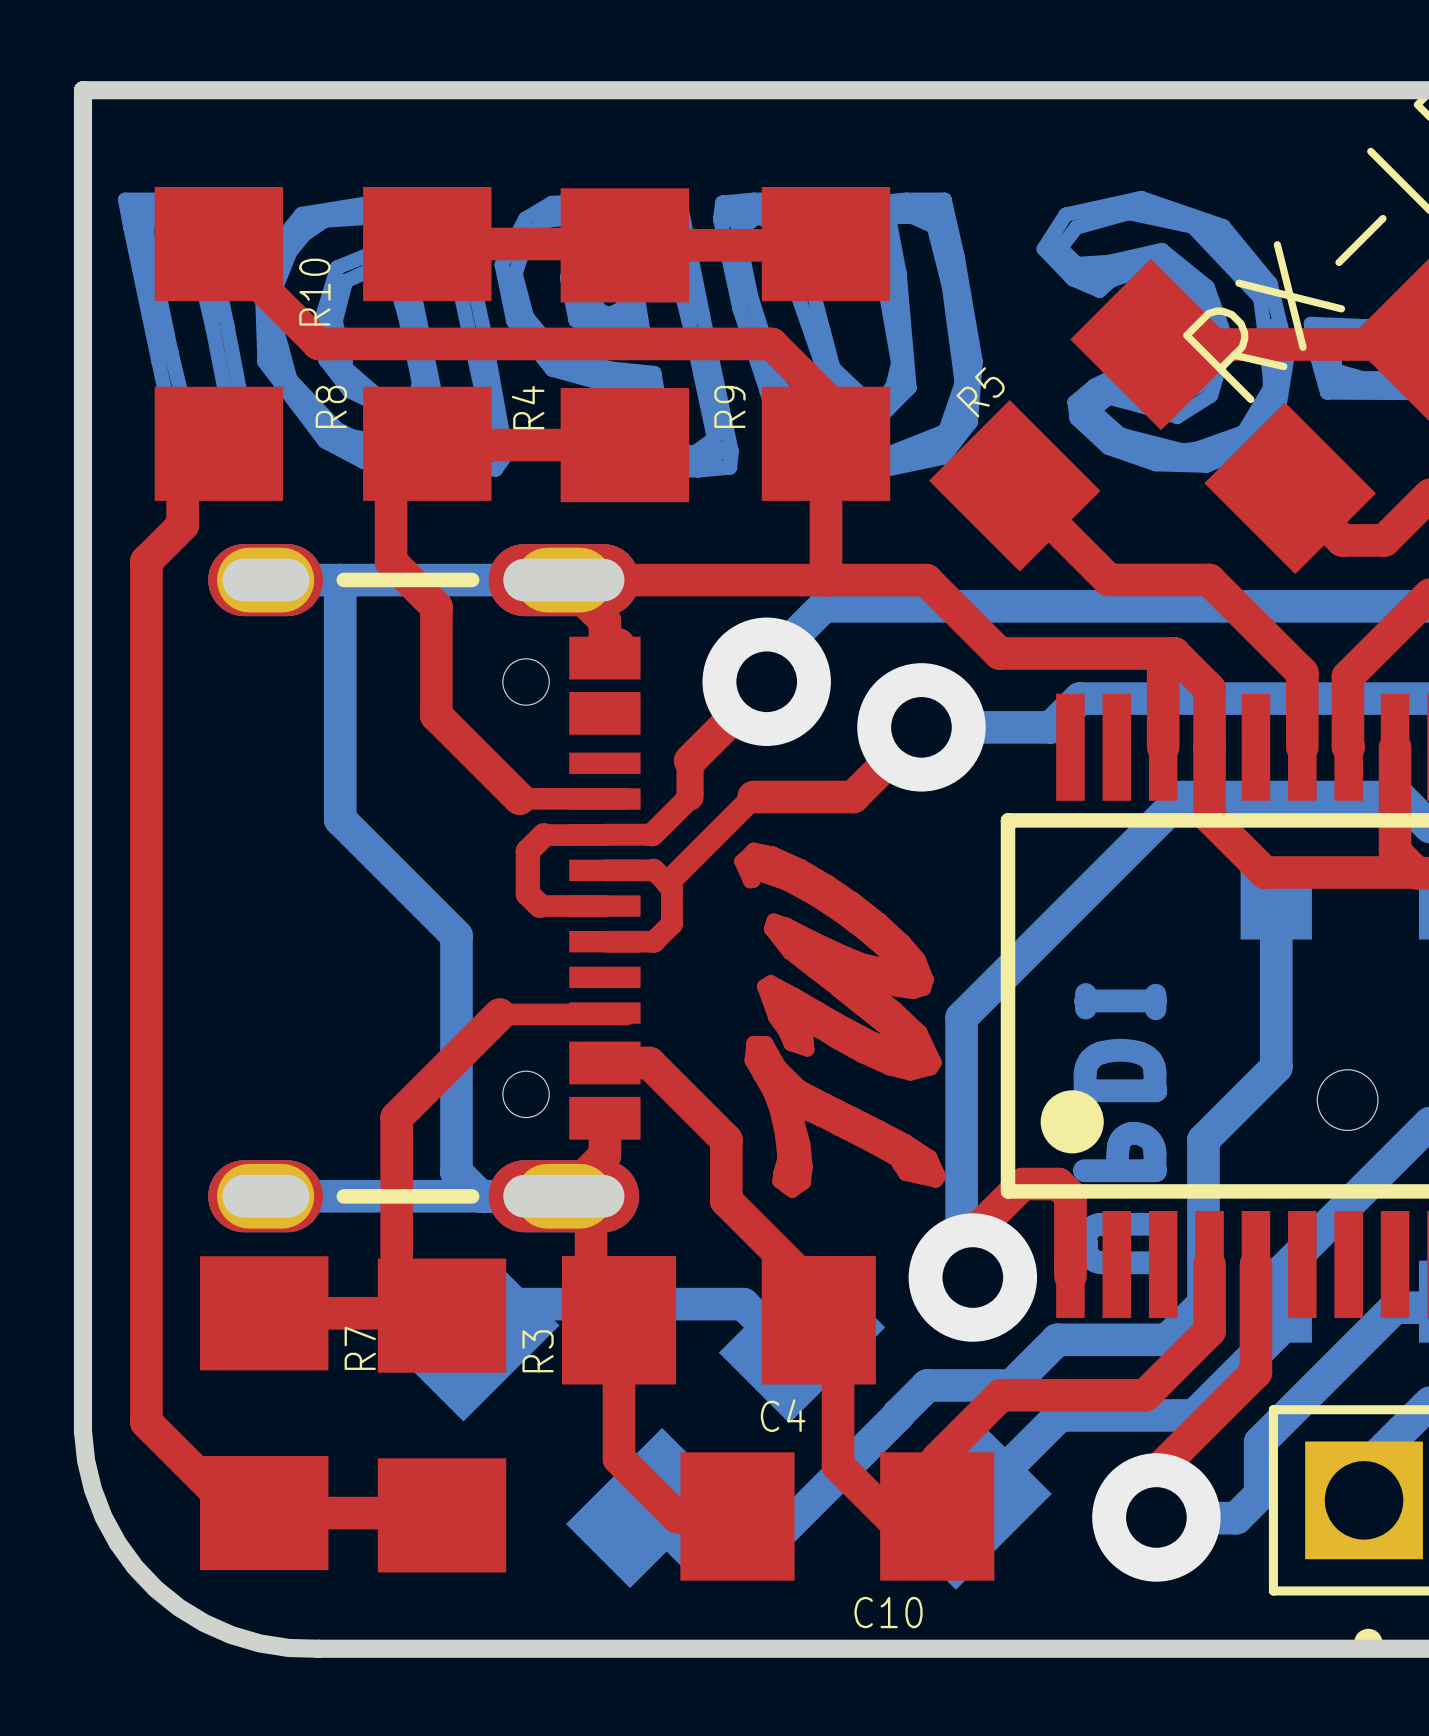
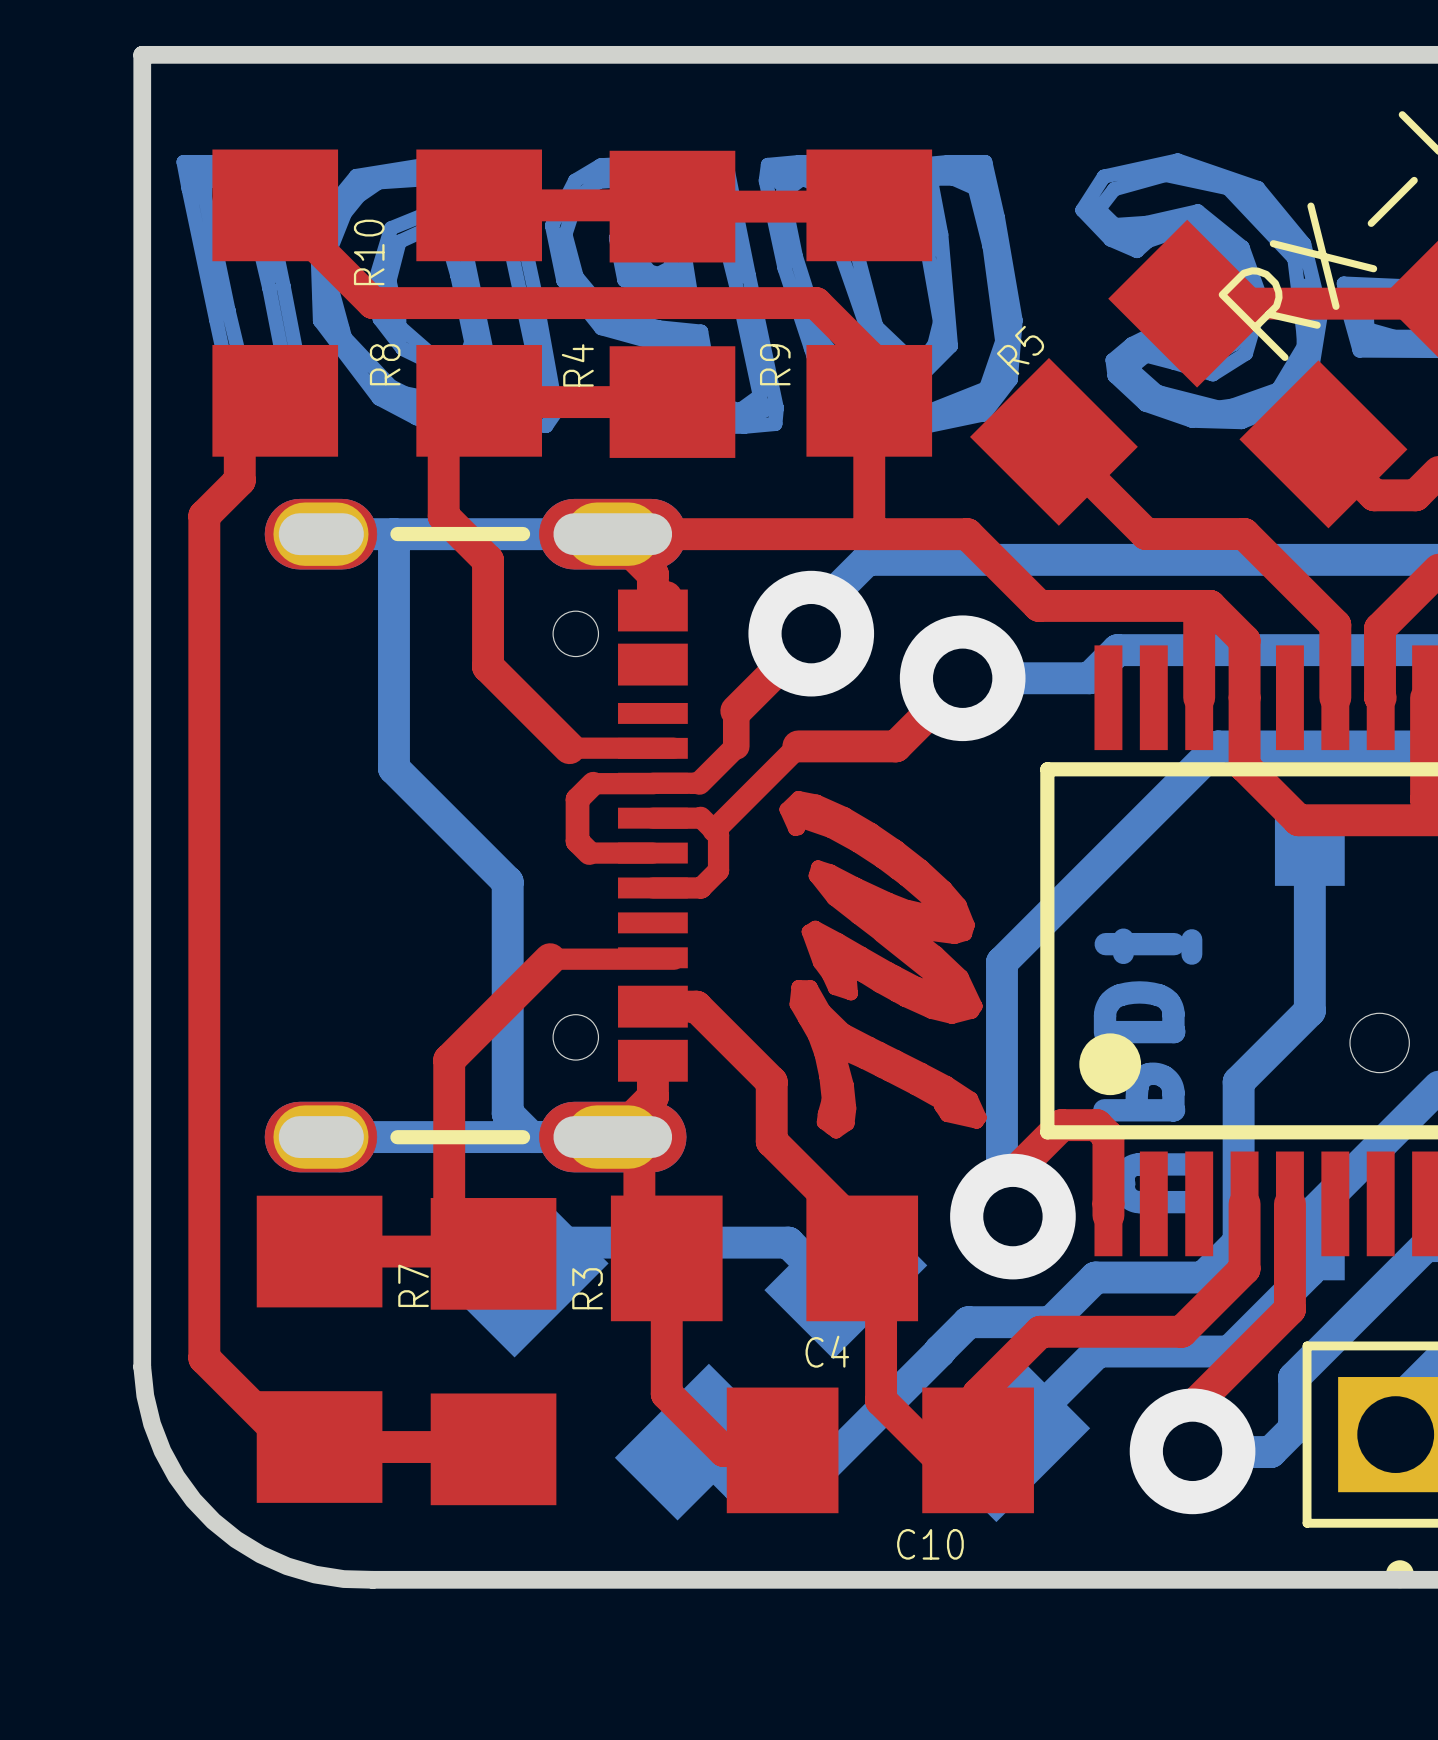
bottom track: (1085, 1000) (1155, 1000) -> (1105, 944) (1174, 944)
bottom track: (1139, 1052) (1147, 1056) (1153, 1063) (1154, 1090) -> (1158, 995) (1166, 998) (1171, 1005) (1173, 1031)
bottom track: (1140, 1052) (1113, 1050) (1094, 1055) (1088, 1062) (1085, 1069) (1085, 1091) -> (1158, 995) (1133, 992) (1114, 997) (1108, 1004) (1105, 1011) (1105, 1032)
bottom track: (1086, 1090) (1155, 1090) -> (1106, 1032) (1174, 1032)
bottom track: (1117, 1167) (1117, 1151) (1120, 1140) (1127, 1134) (1135, 1133) (1145, 1136) (1152, 1143) (1154, 1150) (1154, 1170) -> (1137, 1107) (1137, 1091) (1139, 1080) (1146, 1075) (1154, 1073) (1164, 1076) (1171, 1083) (1173, 1090) (1173, 1110)
bottom track: (1084, 1170) (1155, 1170) -> (1104, 1110) (1174, 1110)

